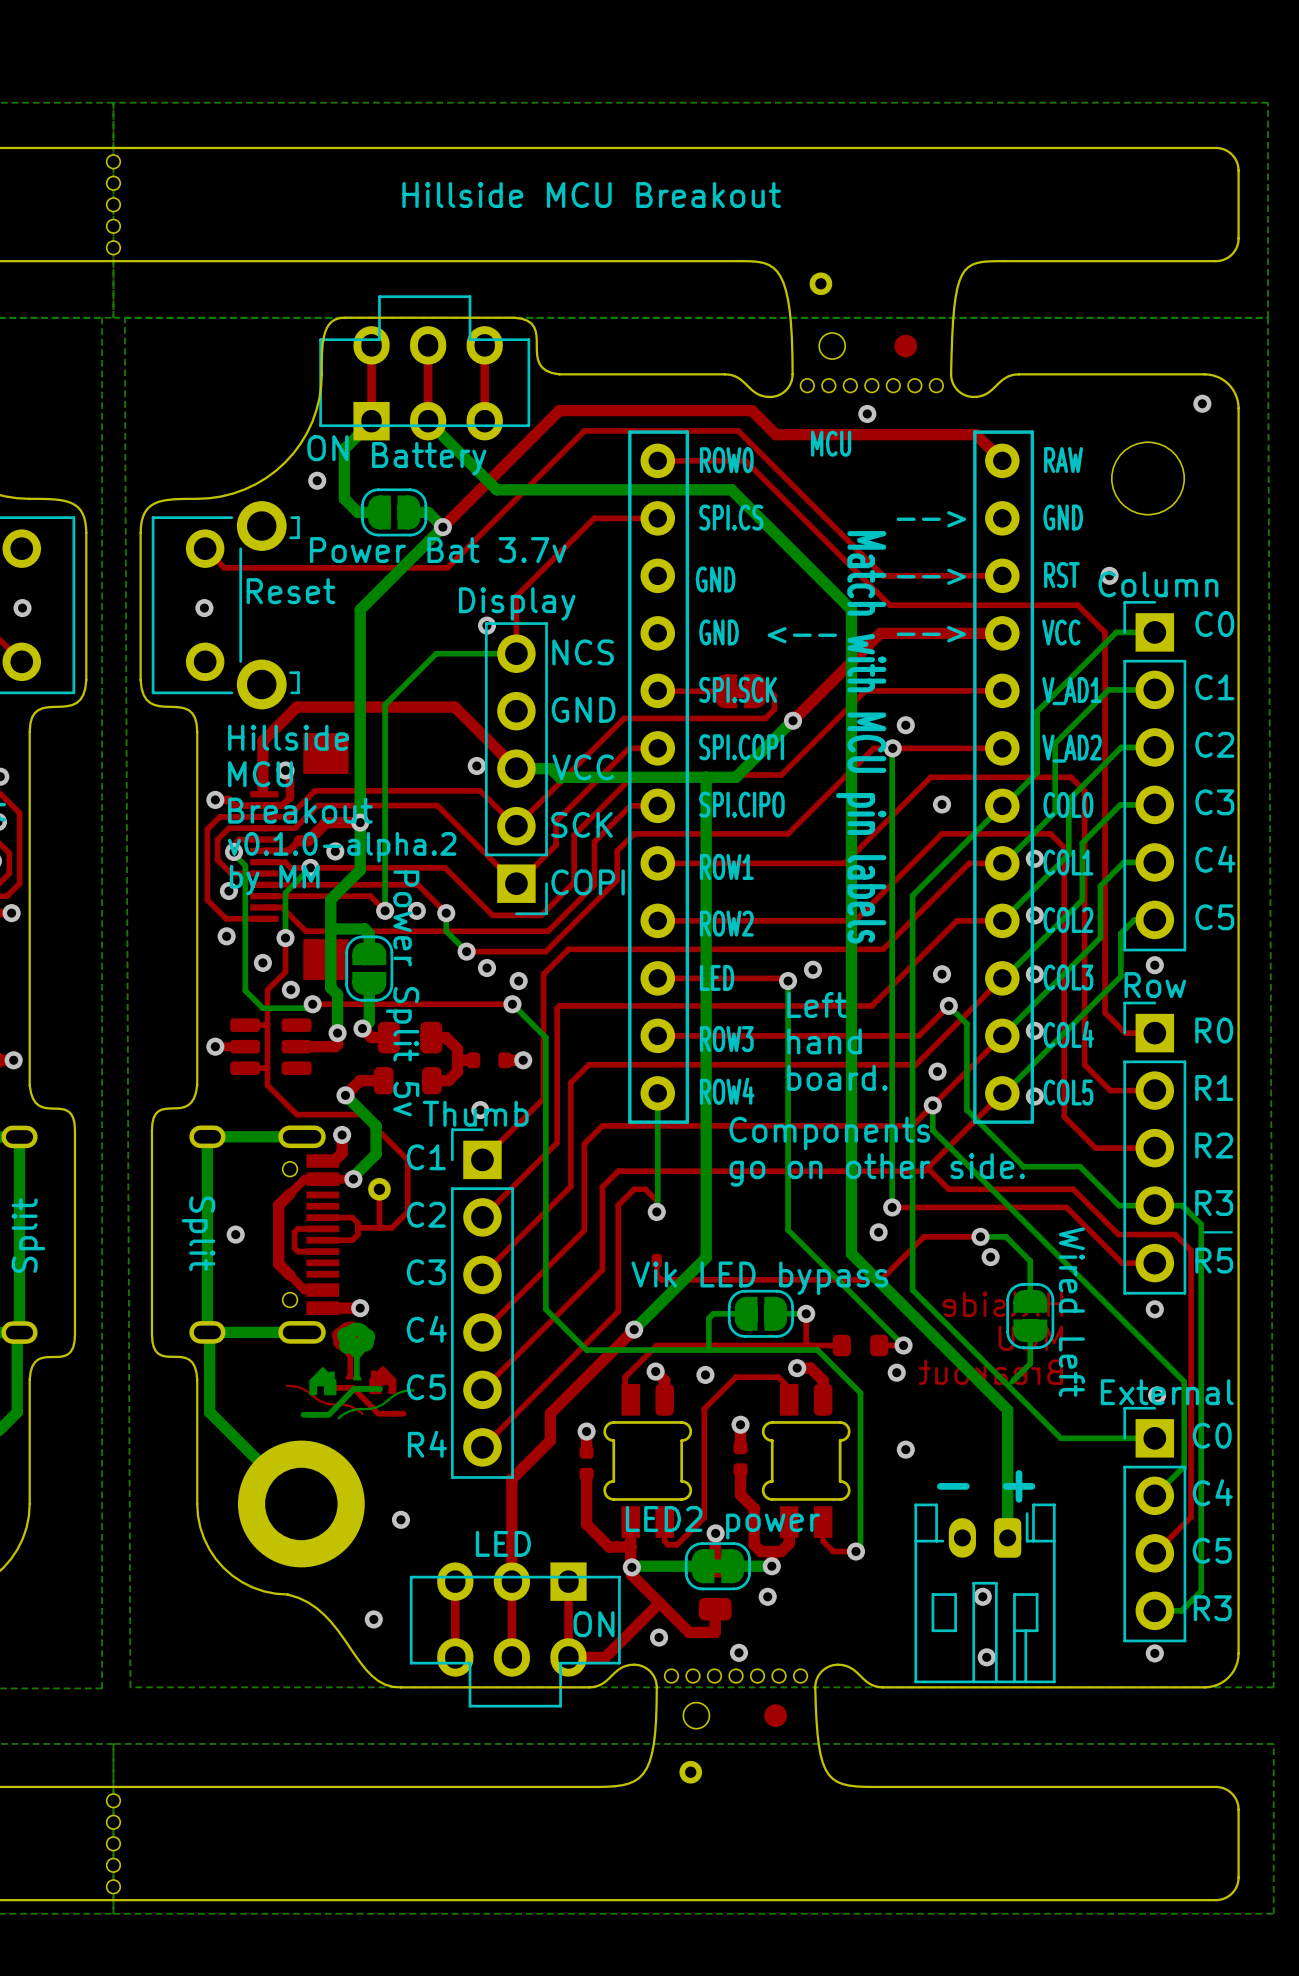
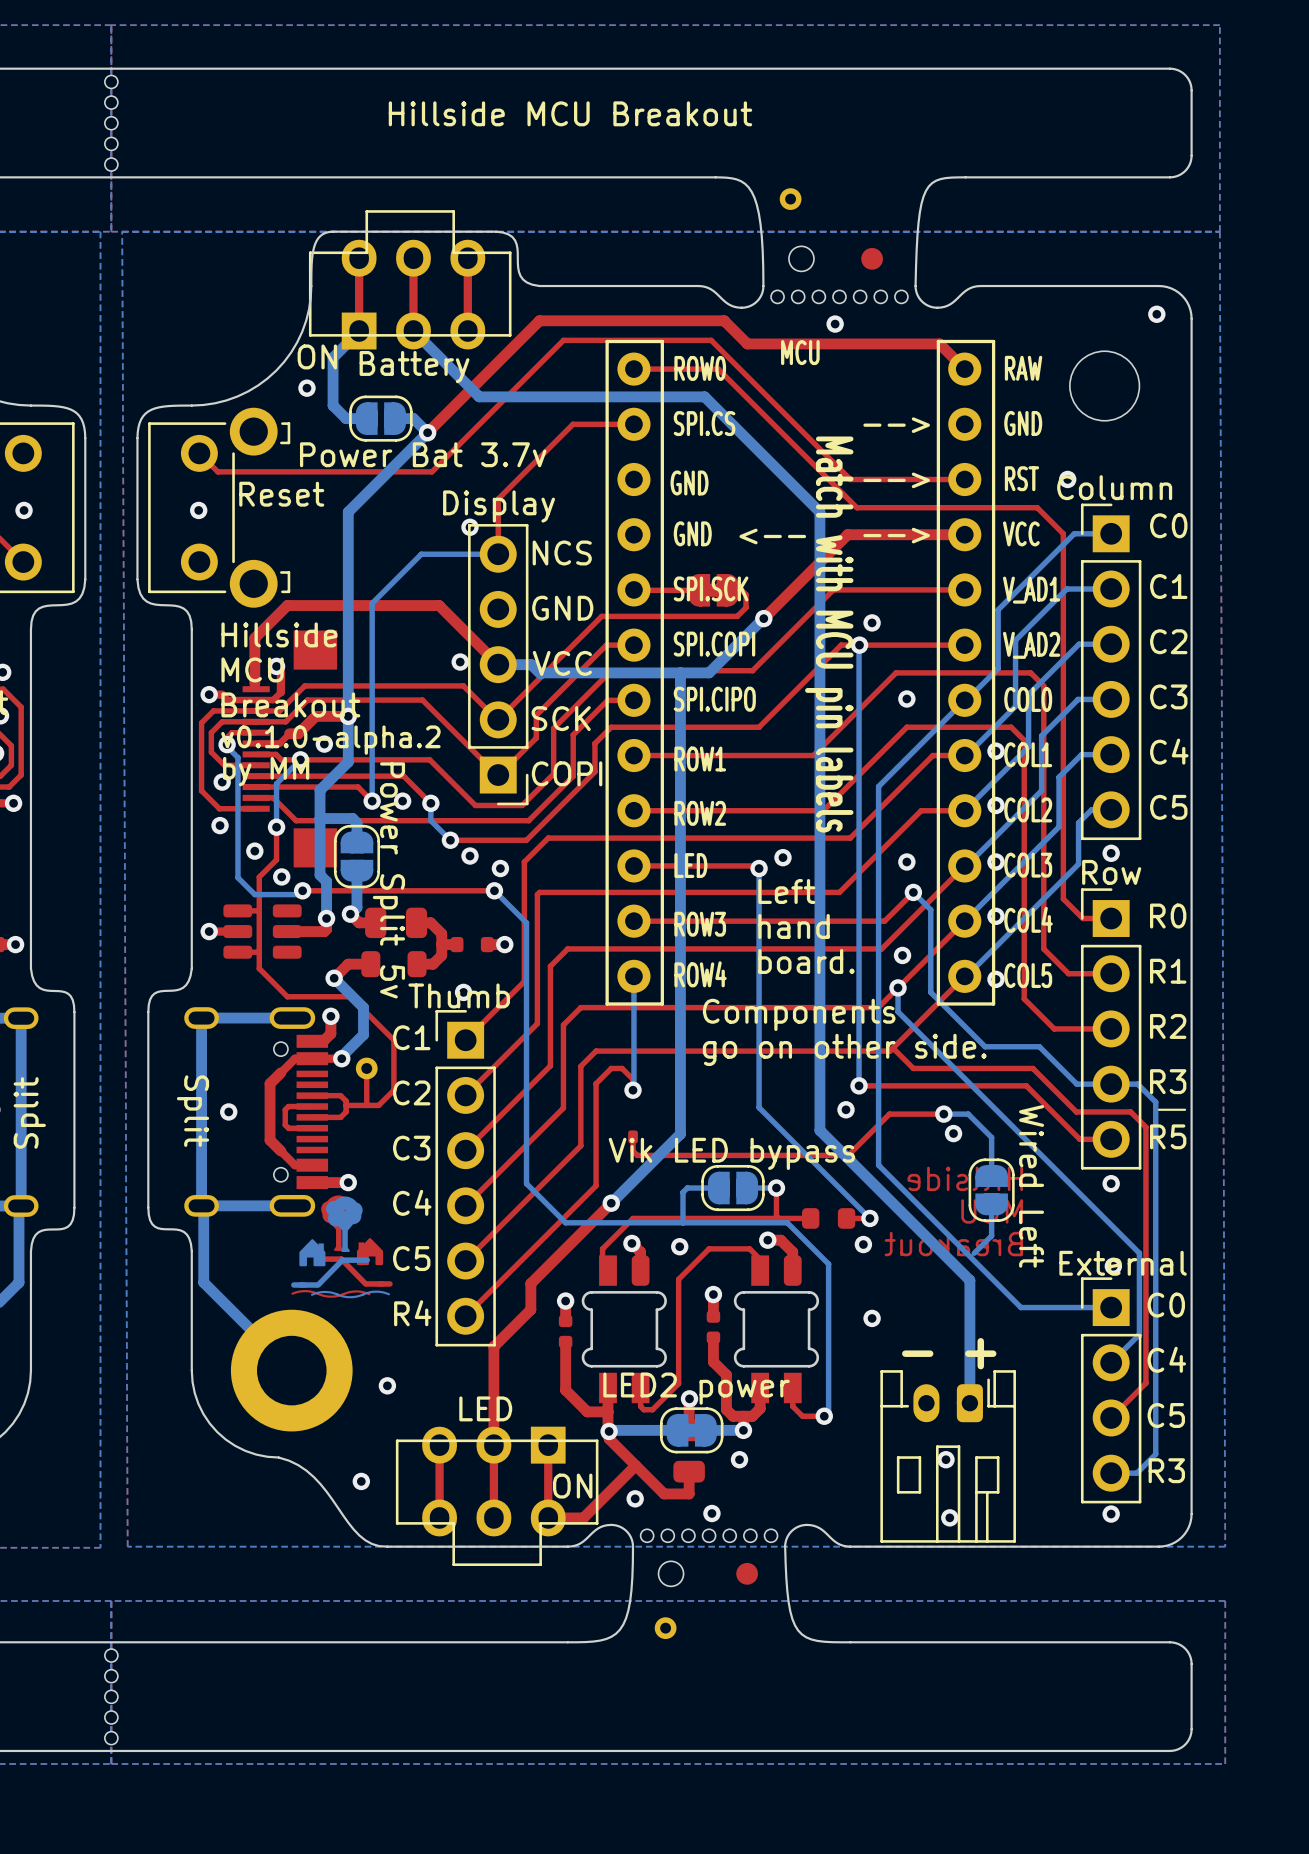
part: (324, 1399) -> none
part: (376, 1404) -> none
part: none -> (330, 1293)
part: none -> (350, 1294)

